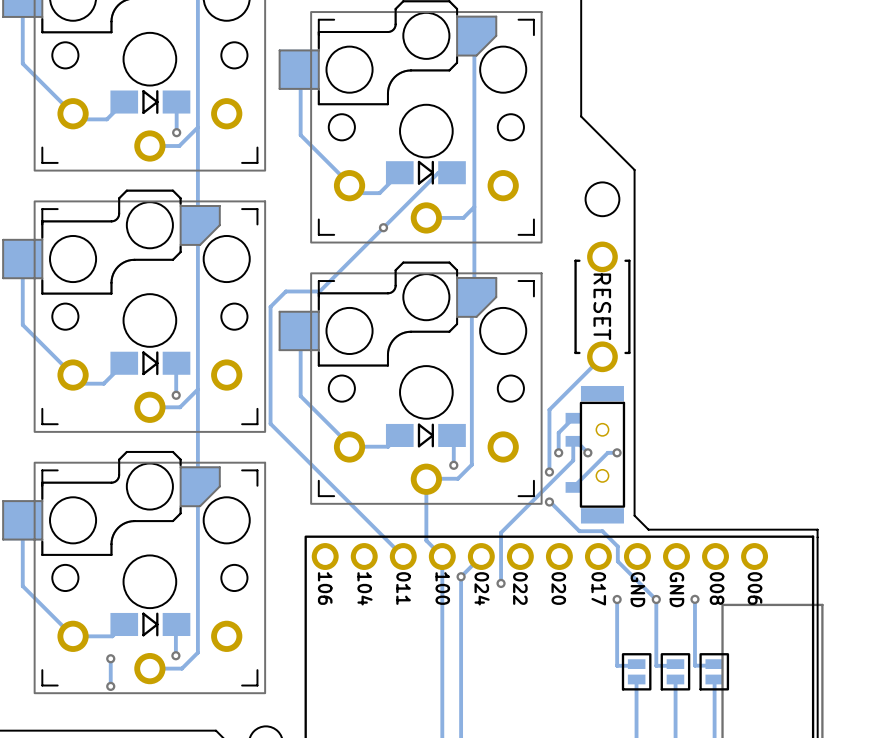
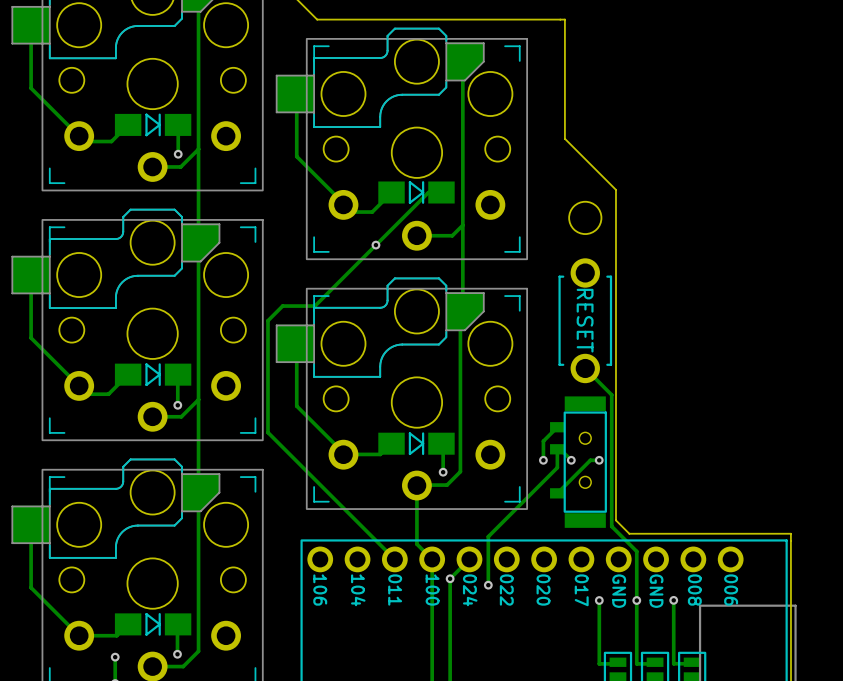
track: (602, 356) (549, 409) (549, 472) -> none
via: (549, 472) -> none
track: (549, 502) (579, 531) (602, 531) (617, 546) (617, 561) (656, 599) -> (585, 368) (611, 394) (611, 526) (636, 551) (636, 600)
via: (549, 502) -> none

